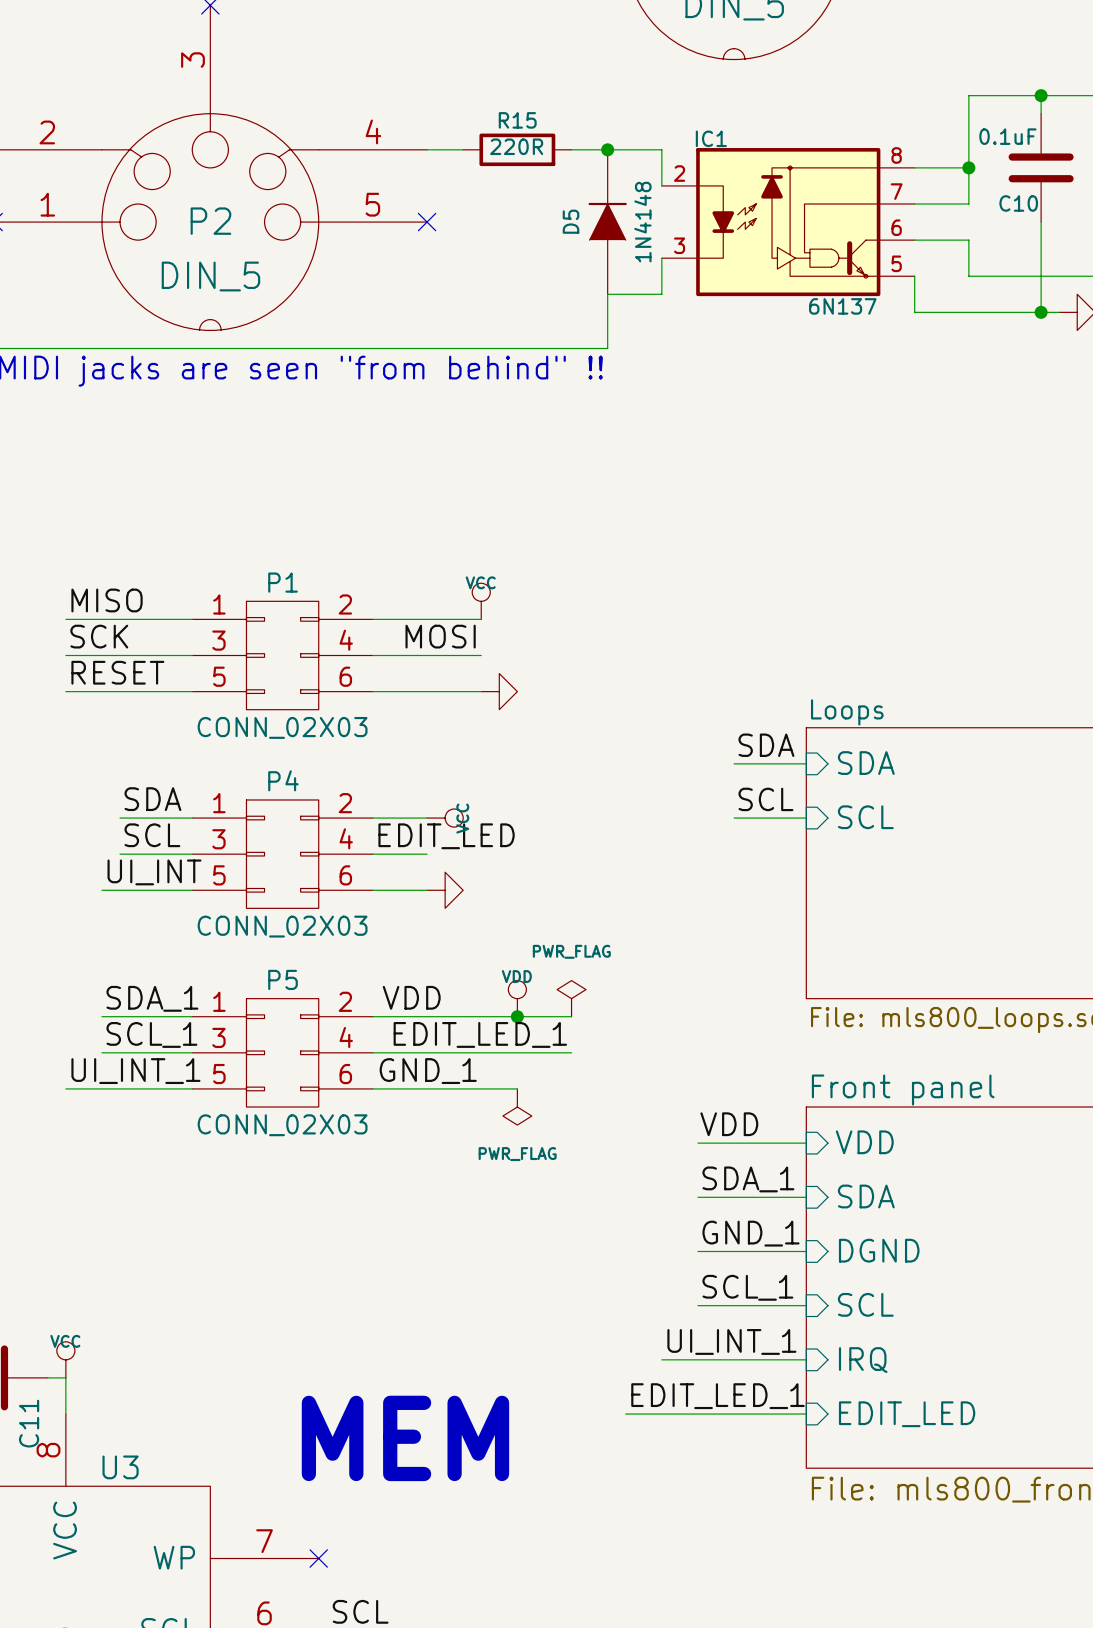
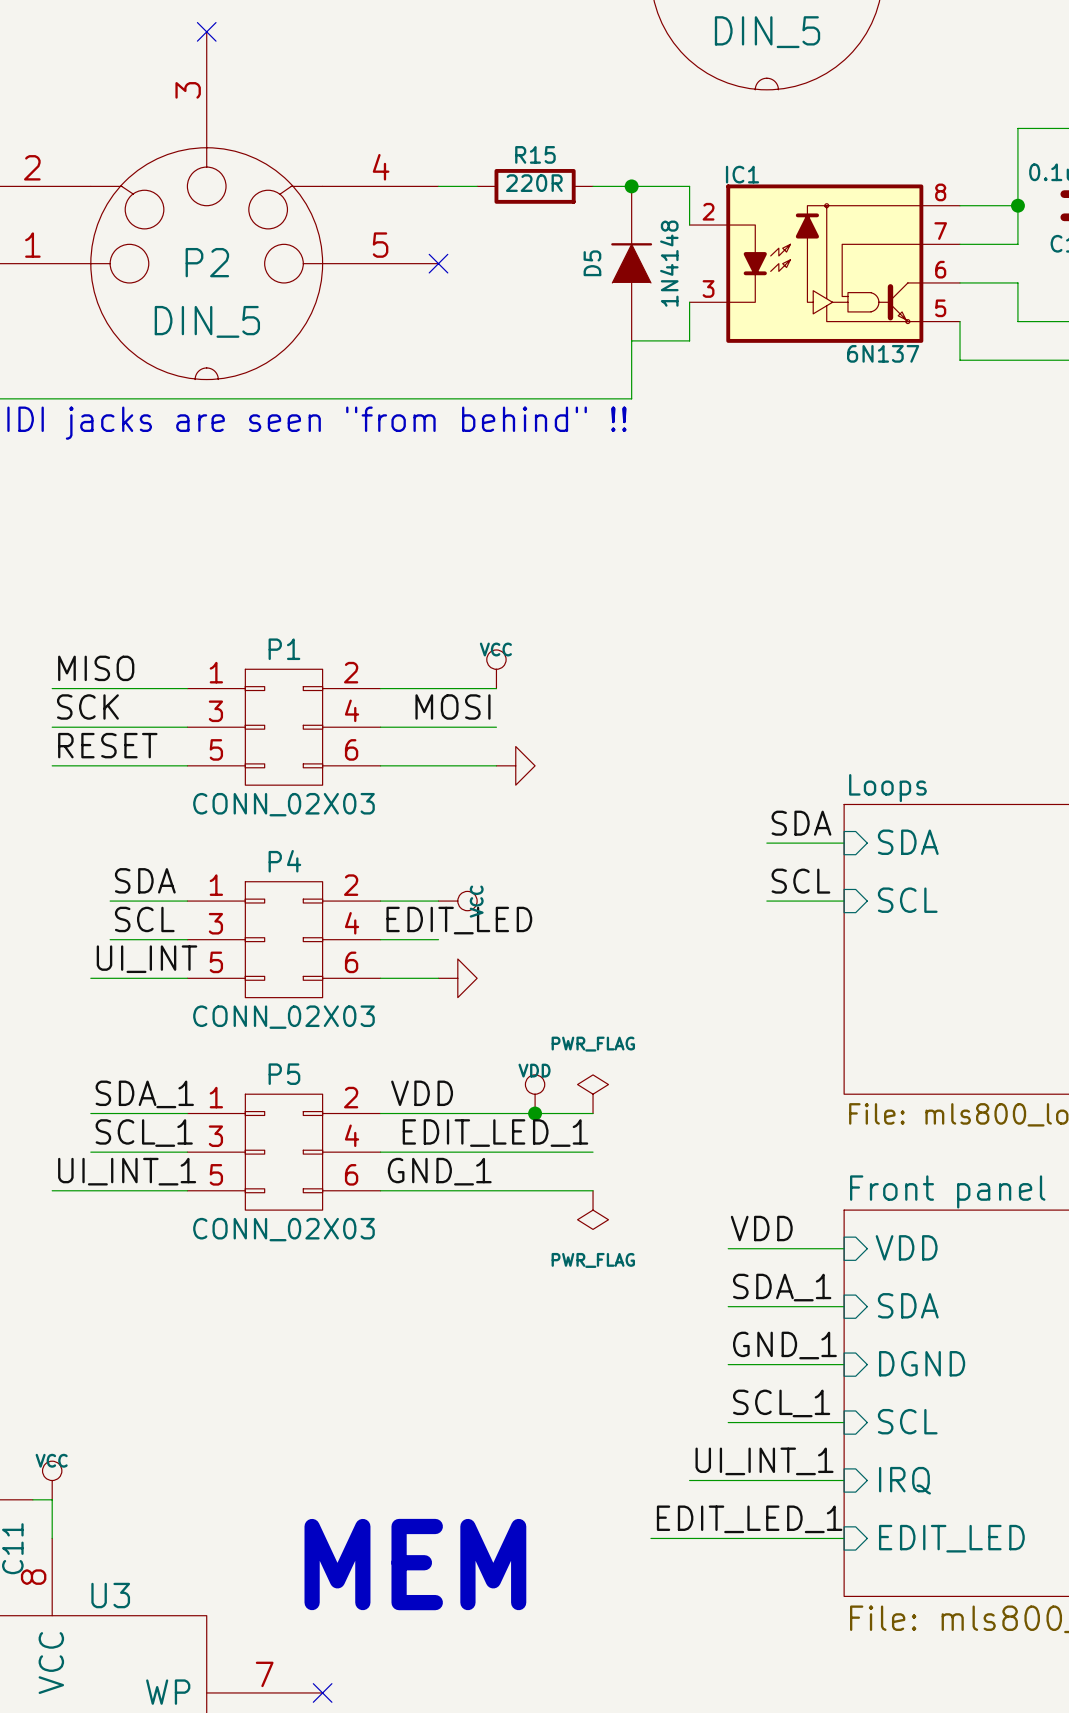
wire: none -> (535, 1190) (593, 1190)
power symbol position: PWR_FLAG (517, 1107) -> PWR_FLAG (593, 1210)

